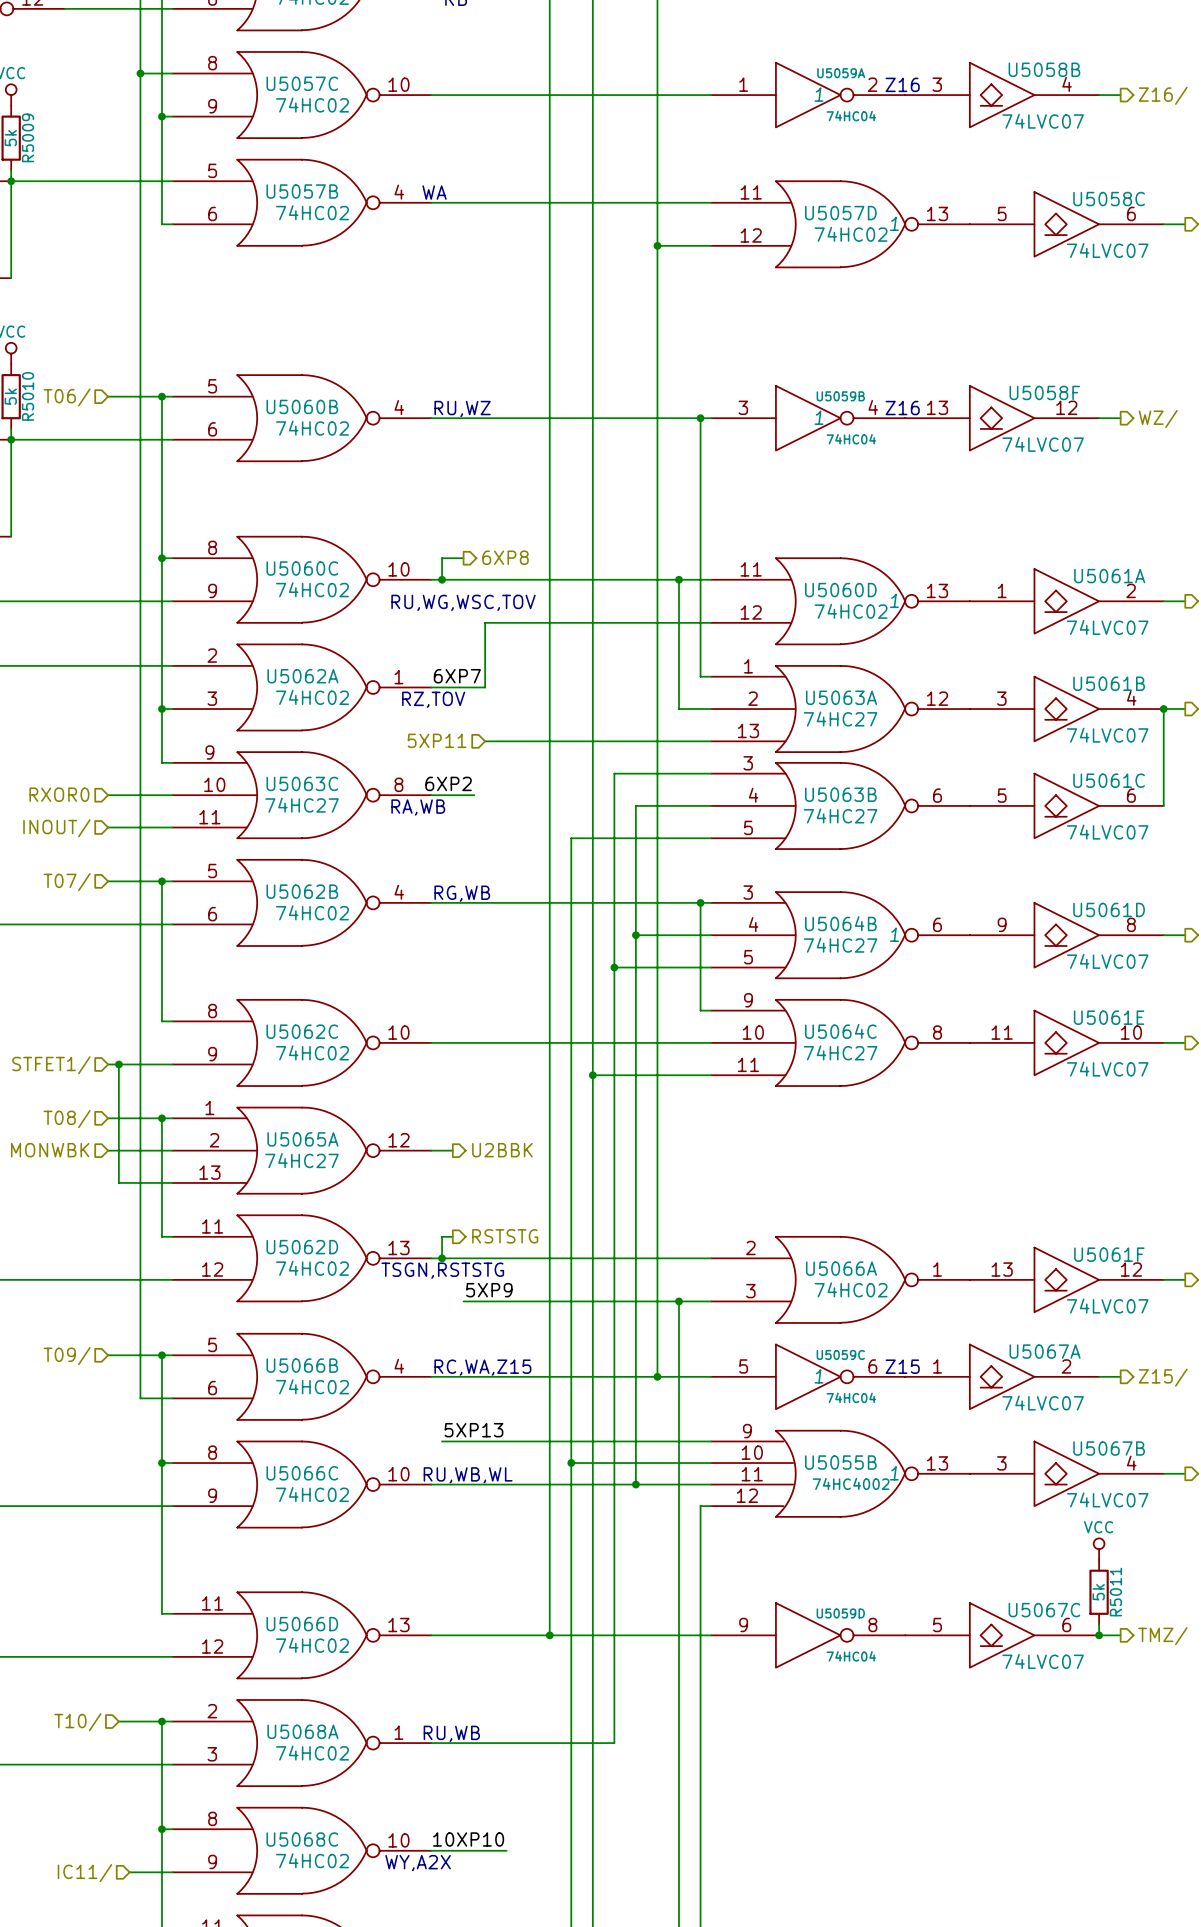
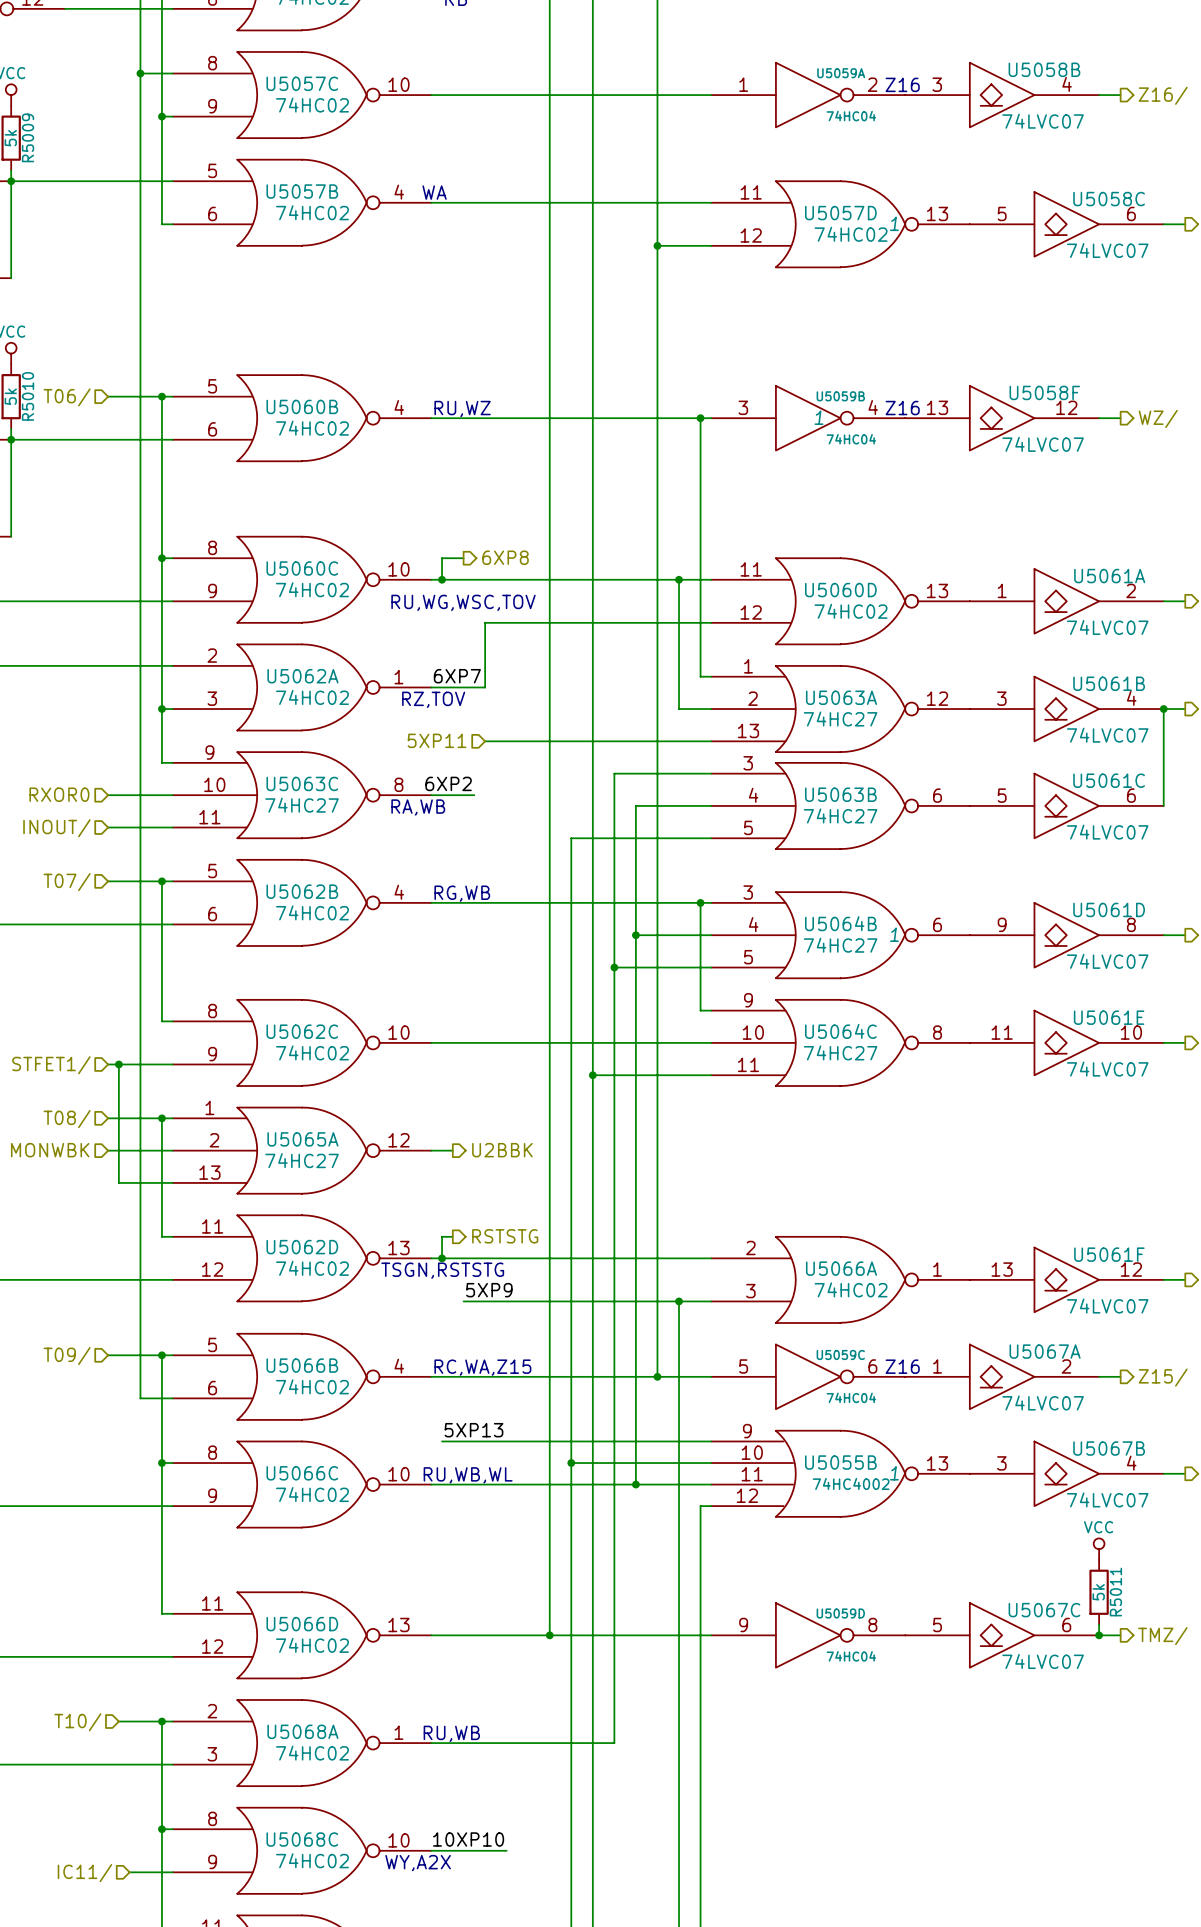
U5059A text: 1 (819, 94) -> none
U5060D text: 1 (894, 600) -> none
text: Z15 (902, 1366) -> Z16 (902, 1366)
U5059C text: 1 (819, 1376) -> none

